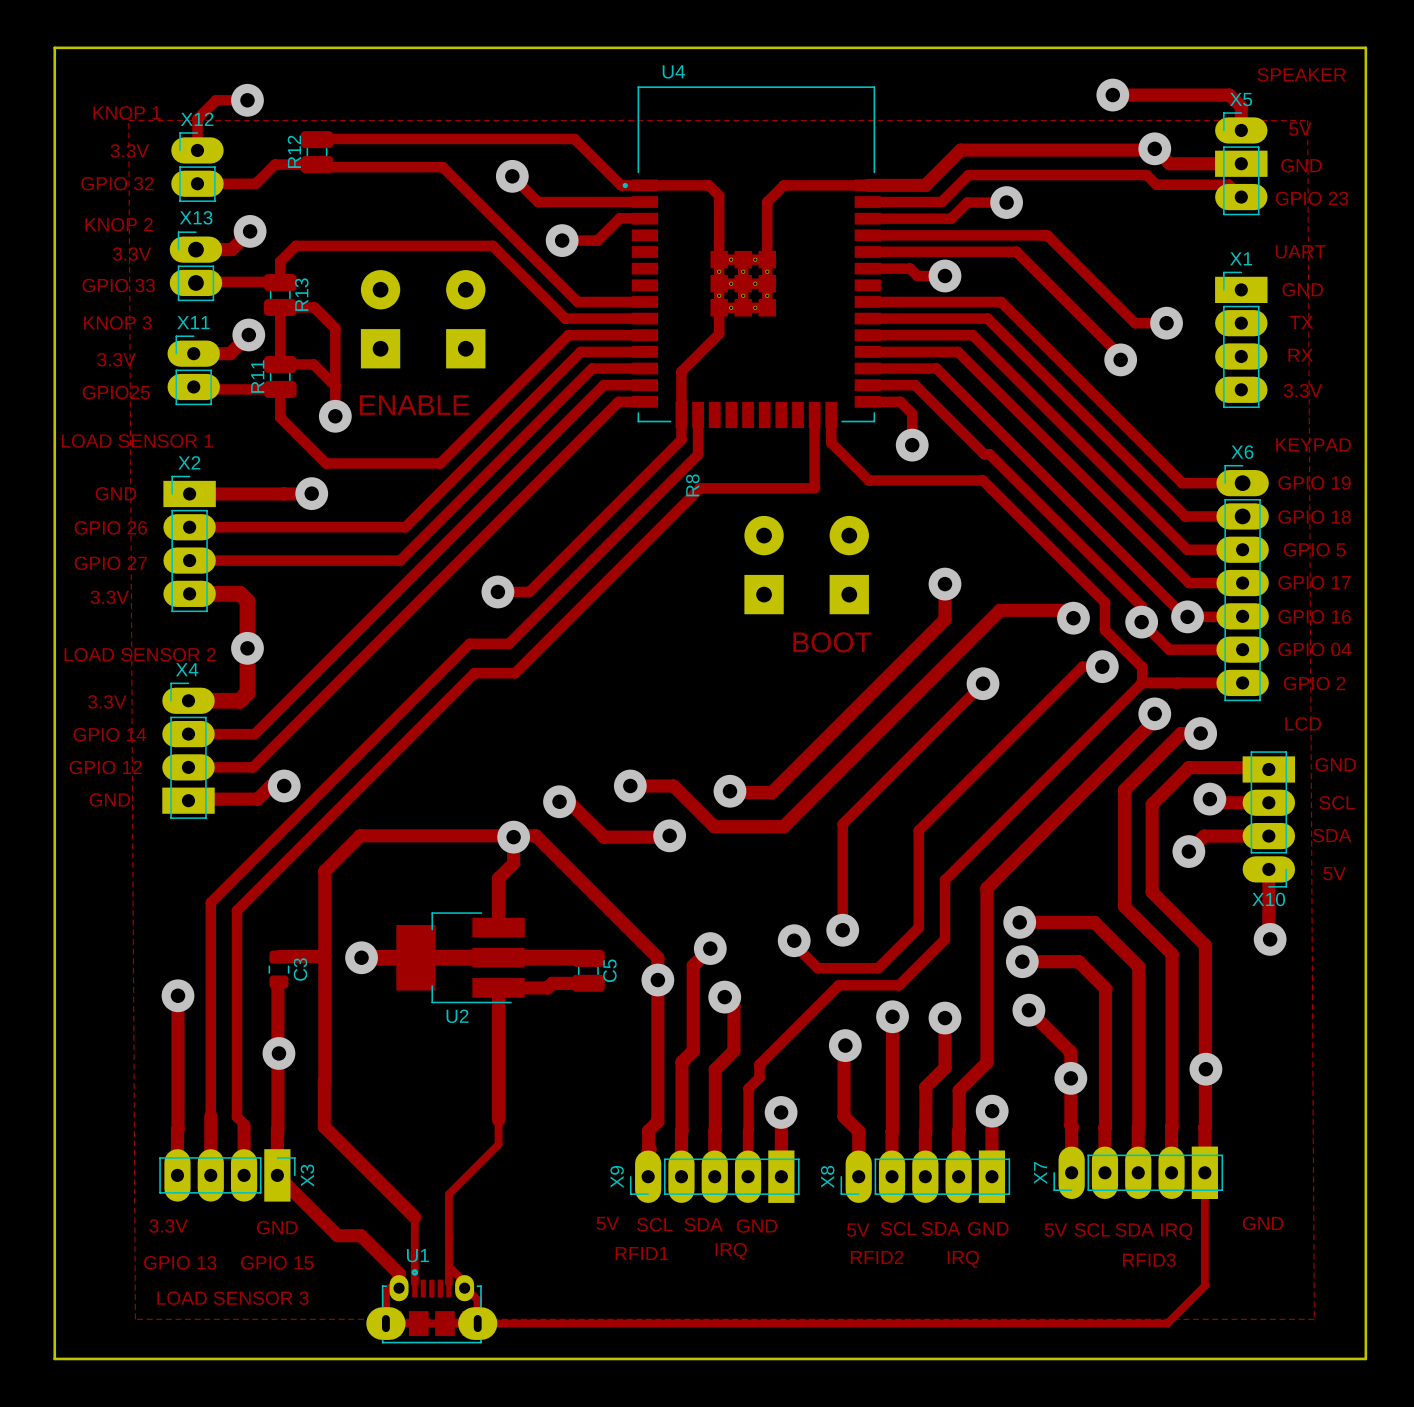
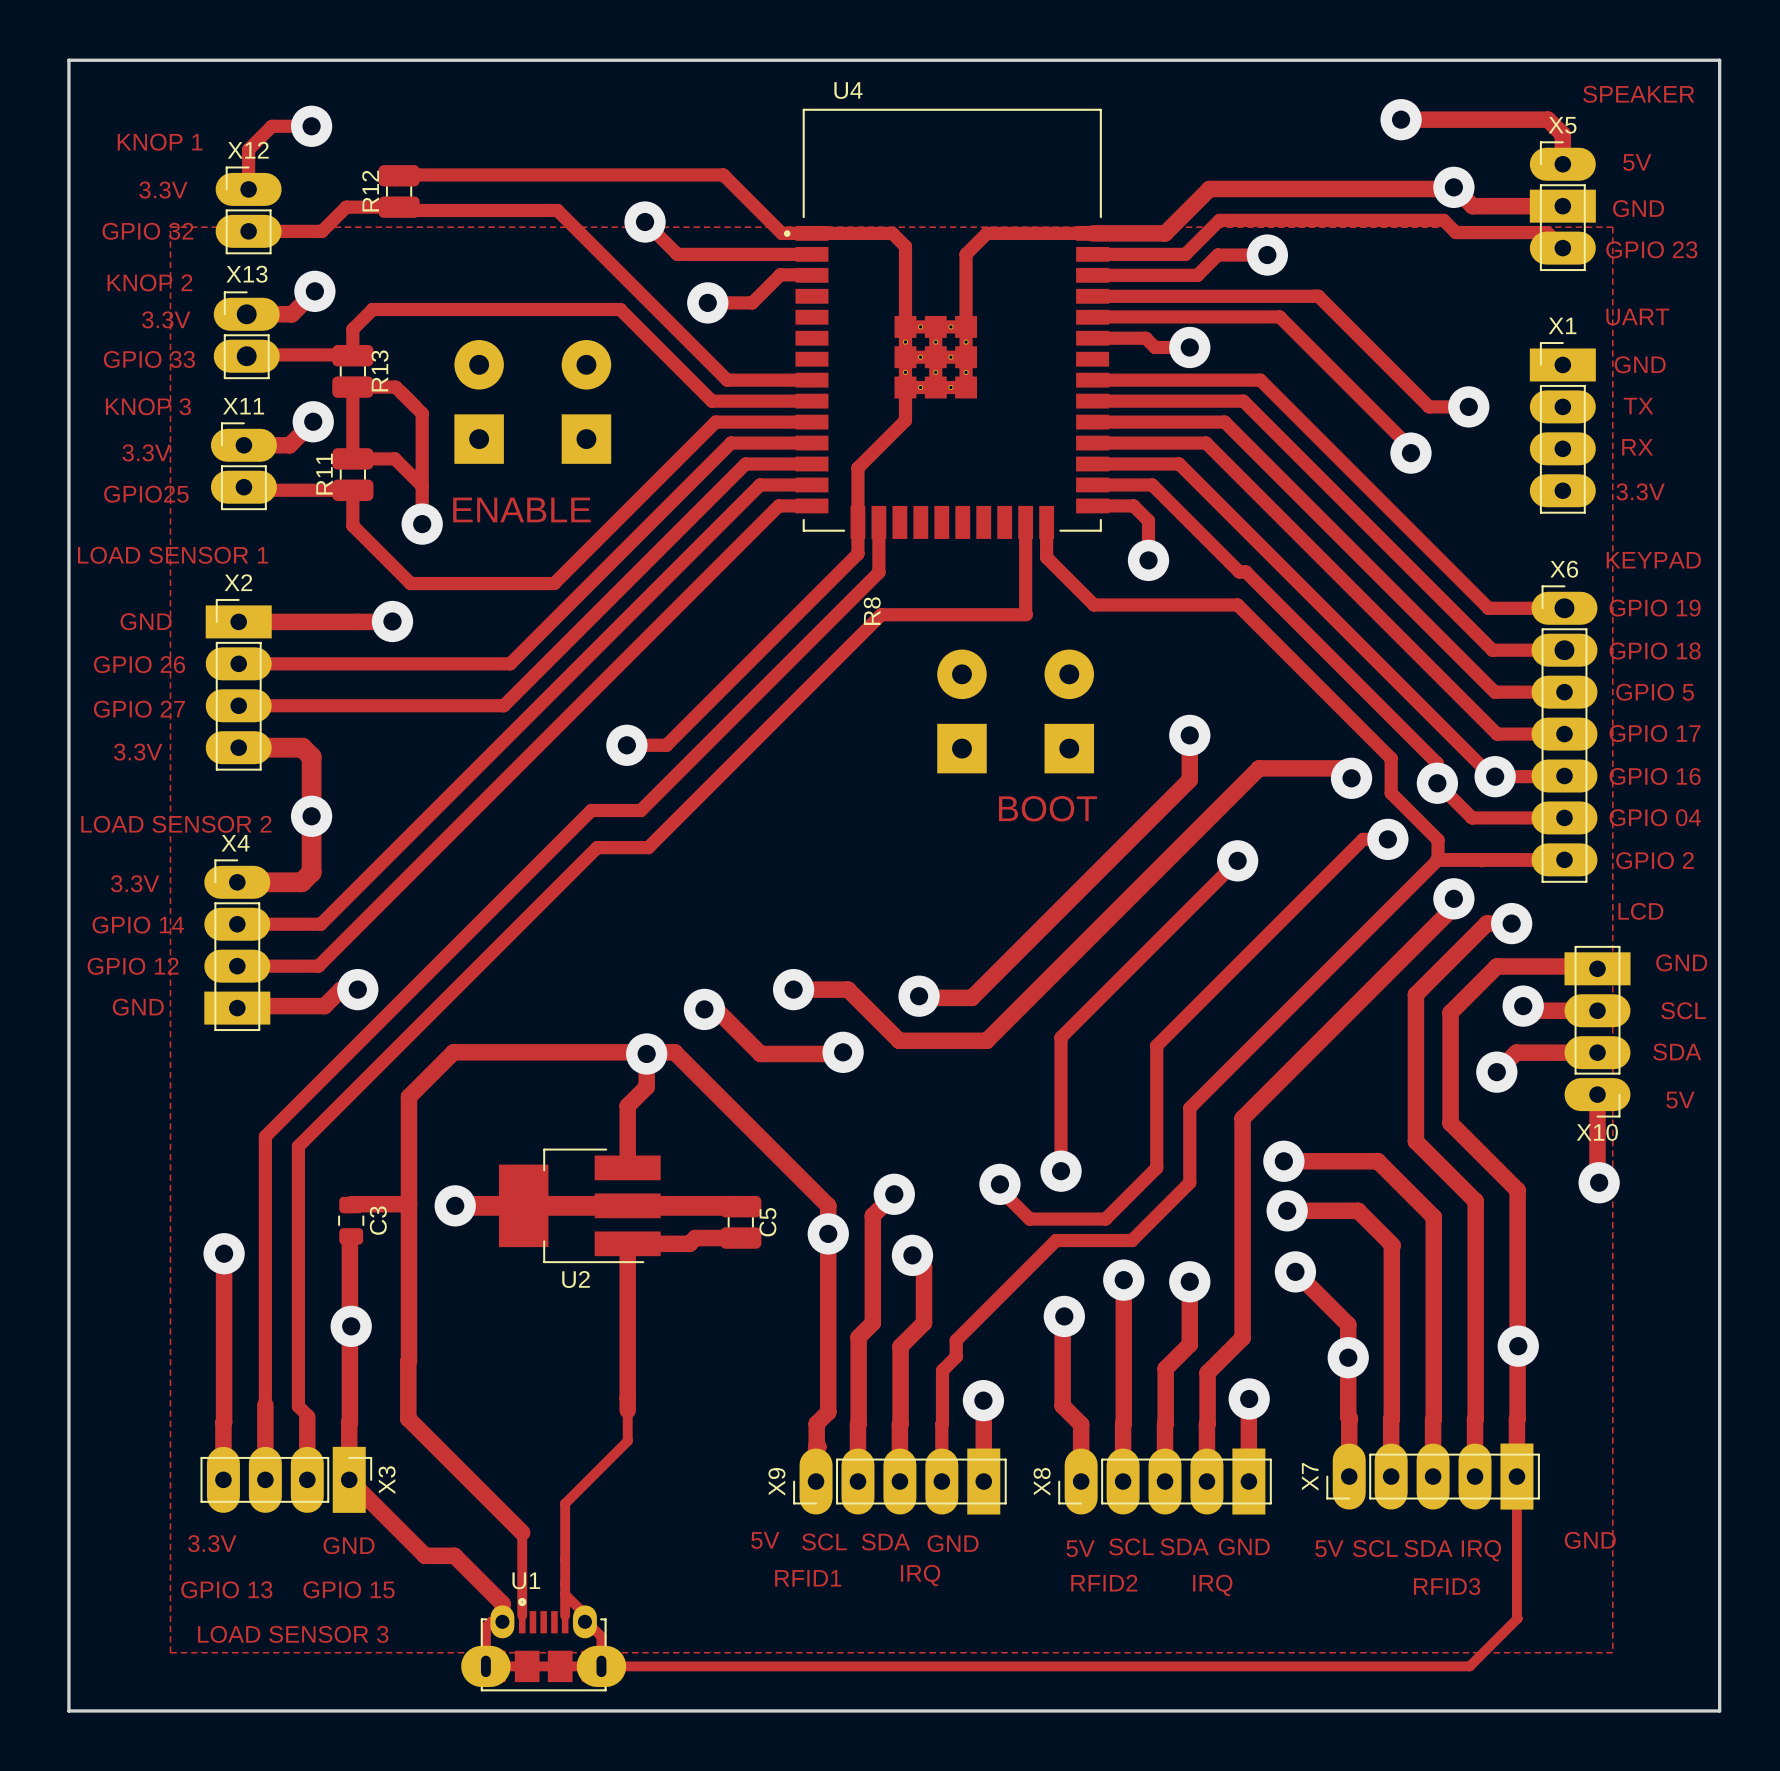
zone outline: (128, 120) (135, 1319) (1314, 1319) (1307, 120) (128, 120) -> (170, 227) (170, 1652) (1612, 1652) (1612, 227) (170, 227)

